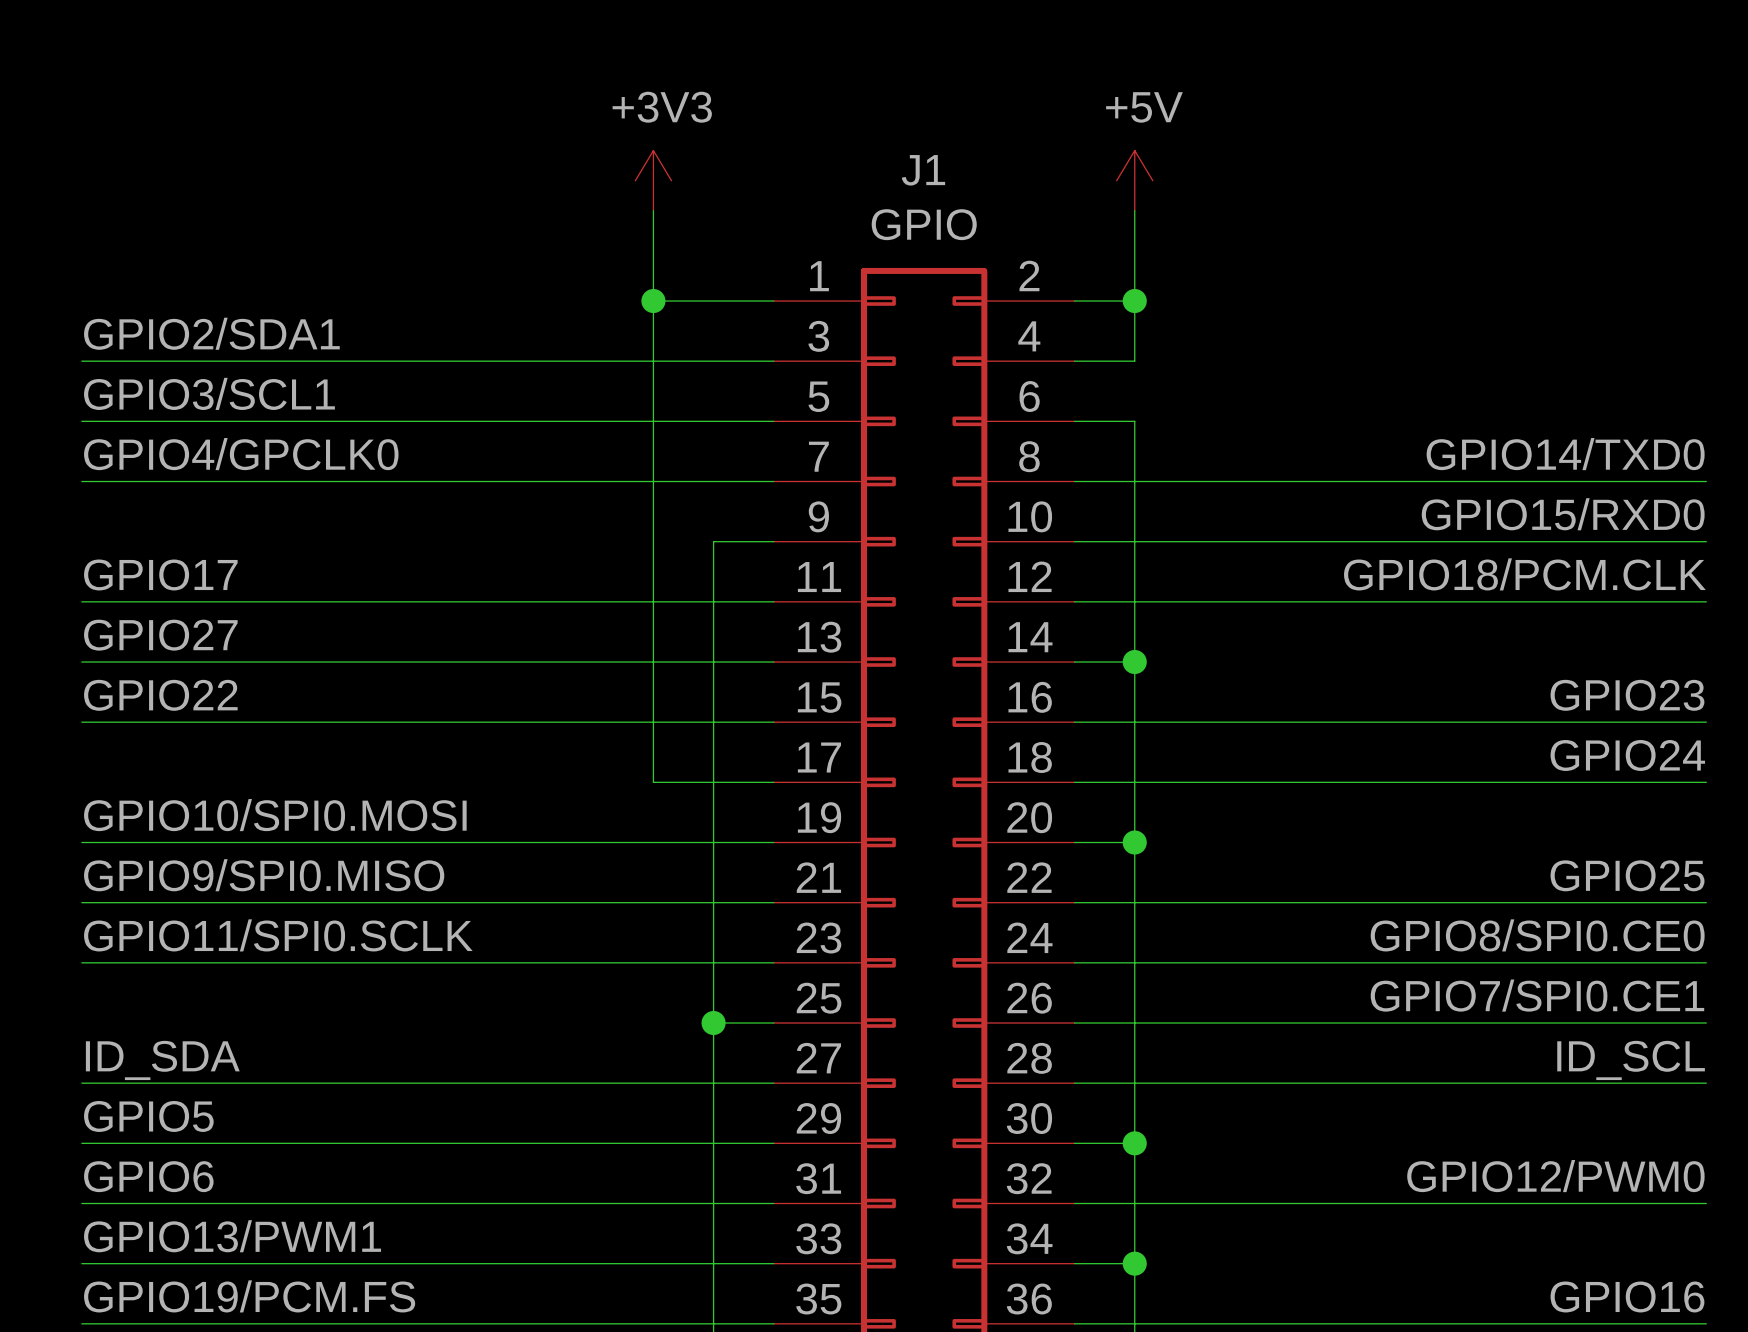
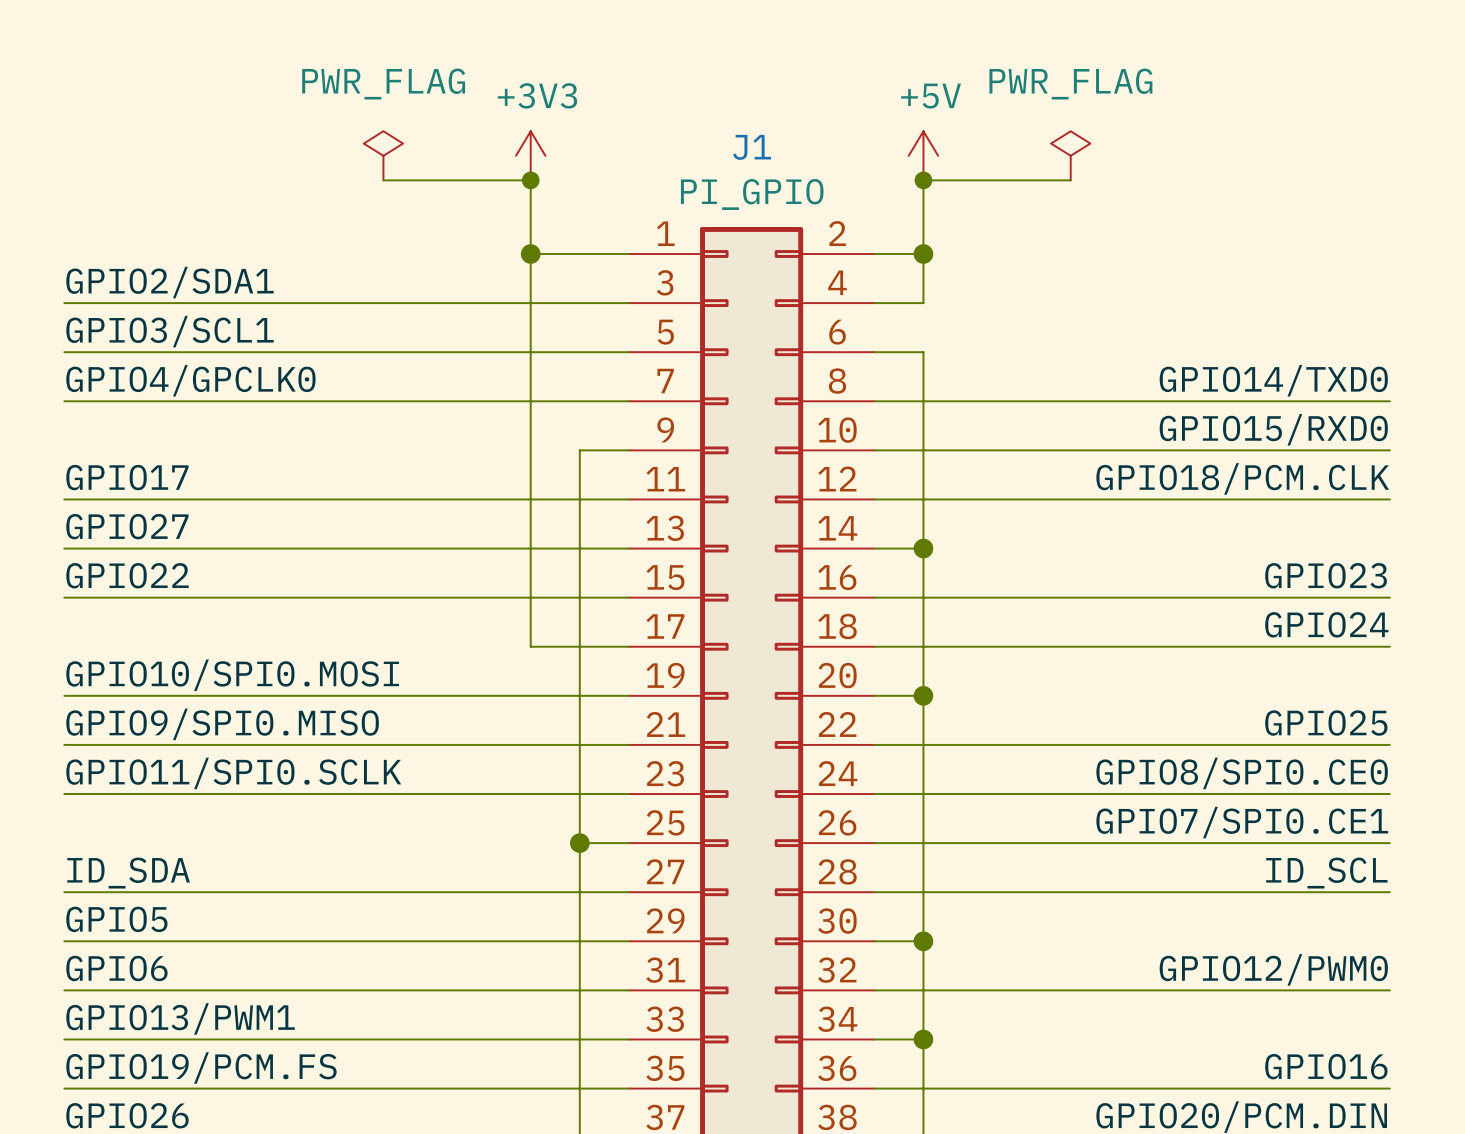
power symbol: none -> PWR_FLAG (383, 155)
power symbol: none -> PWR_FLAG (1070, 155)
wire: none -> (383, 180) (530, 180)
junction: none -> (530, 180)
wire: none -> (923, 180) (1070, 180)
junction: none -> (923, 180)
J1 value: GPIO (924, 224) -> PI_GPIO (752, 194)

